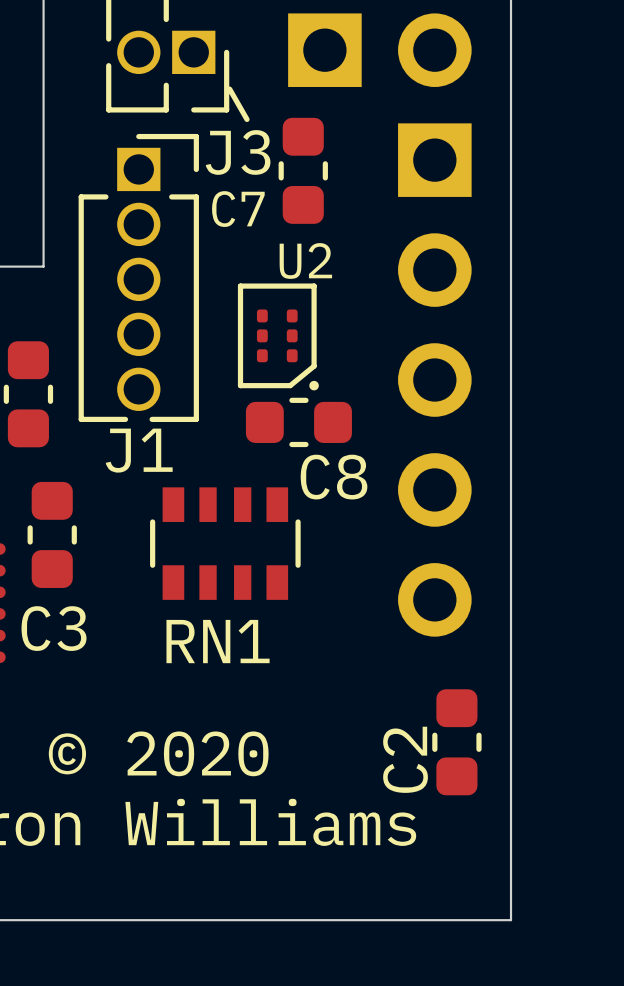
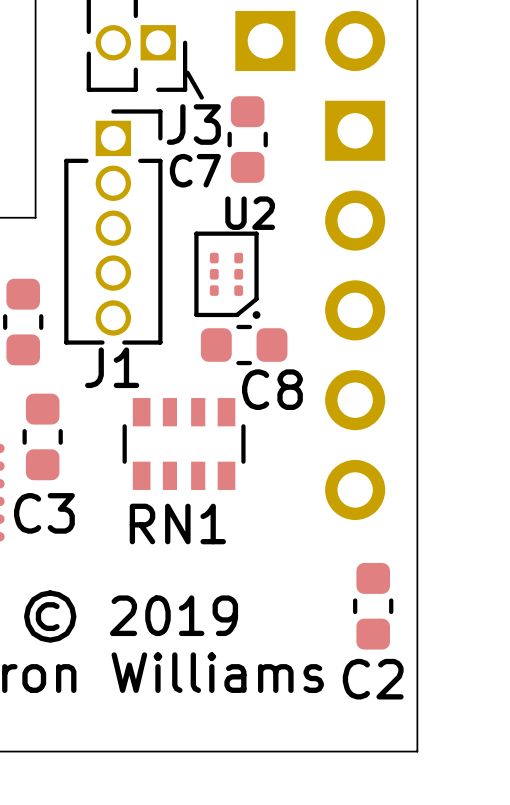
text: © 2020 (158, 753) -> © 2019 (131, 616)
C2 name rotation: 0° (405, 759) -> 90° clockwise (373, 679)

